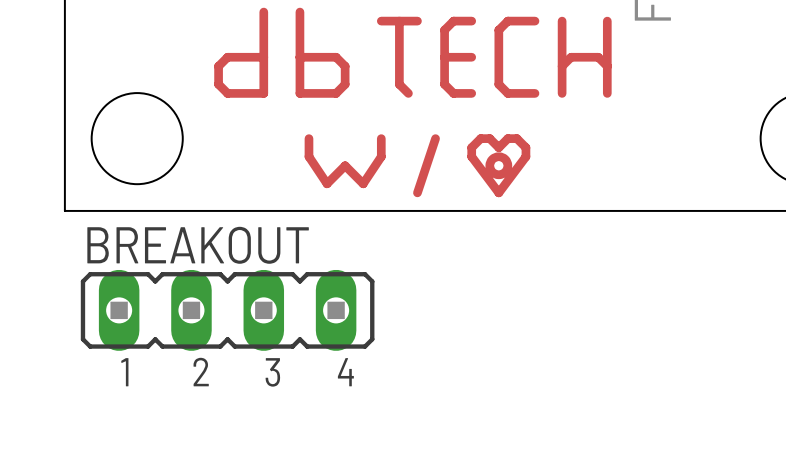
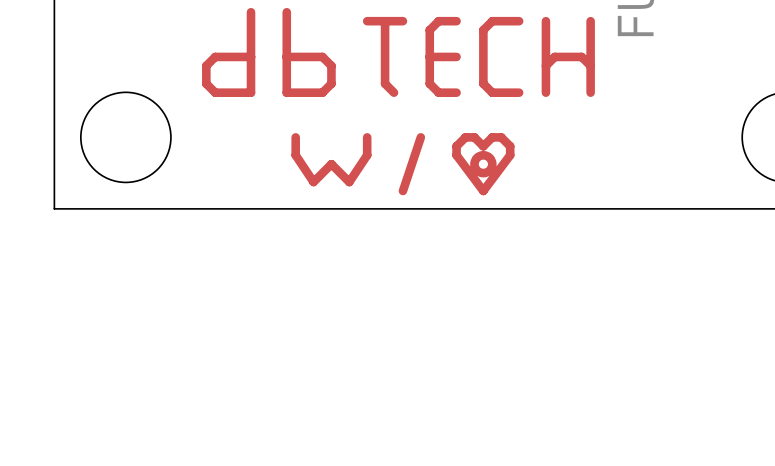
BREAKOUT: (227, 310) -> none

